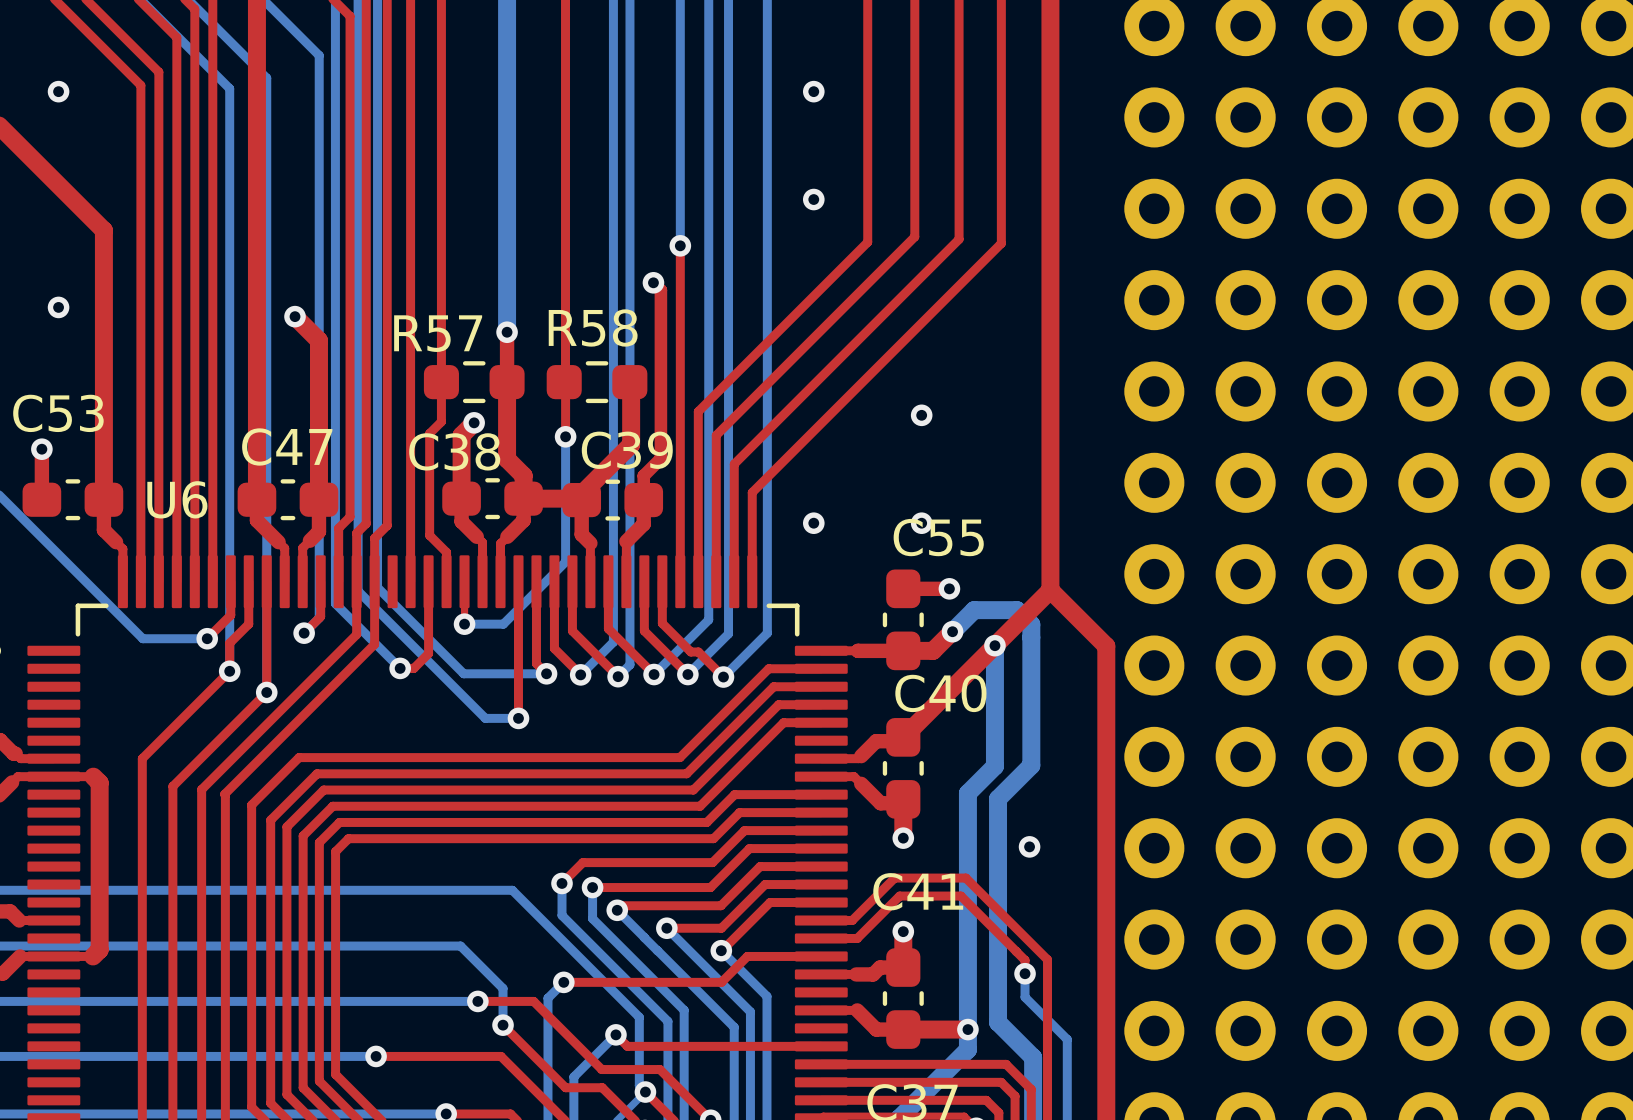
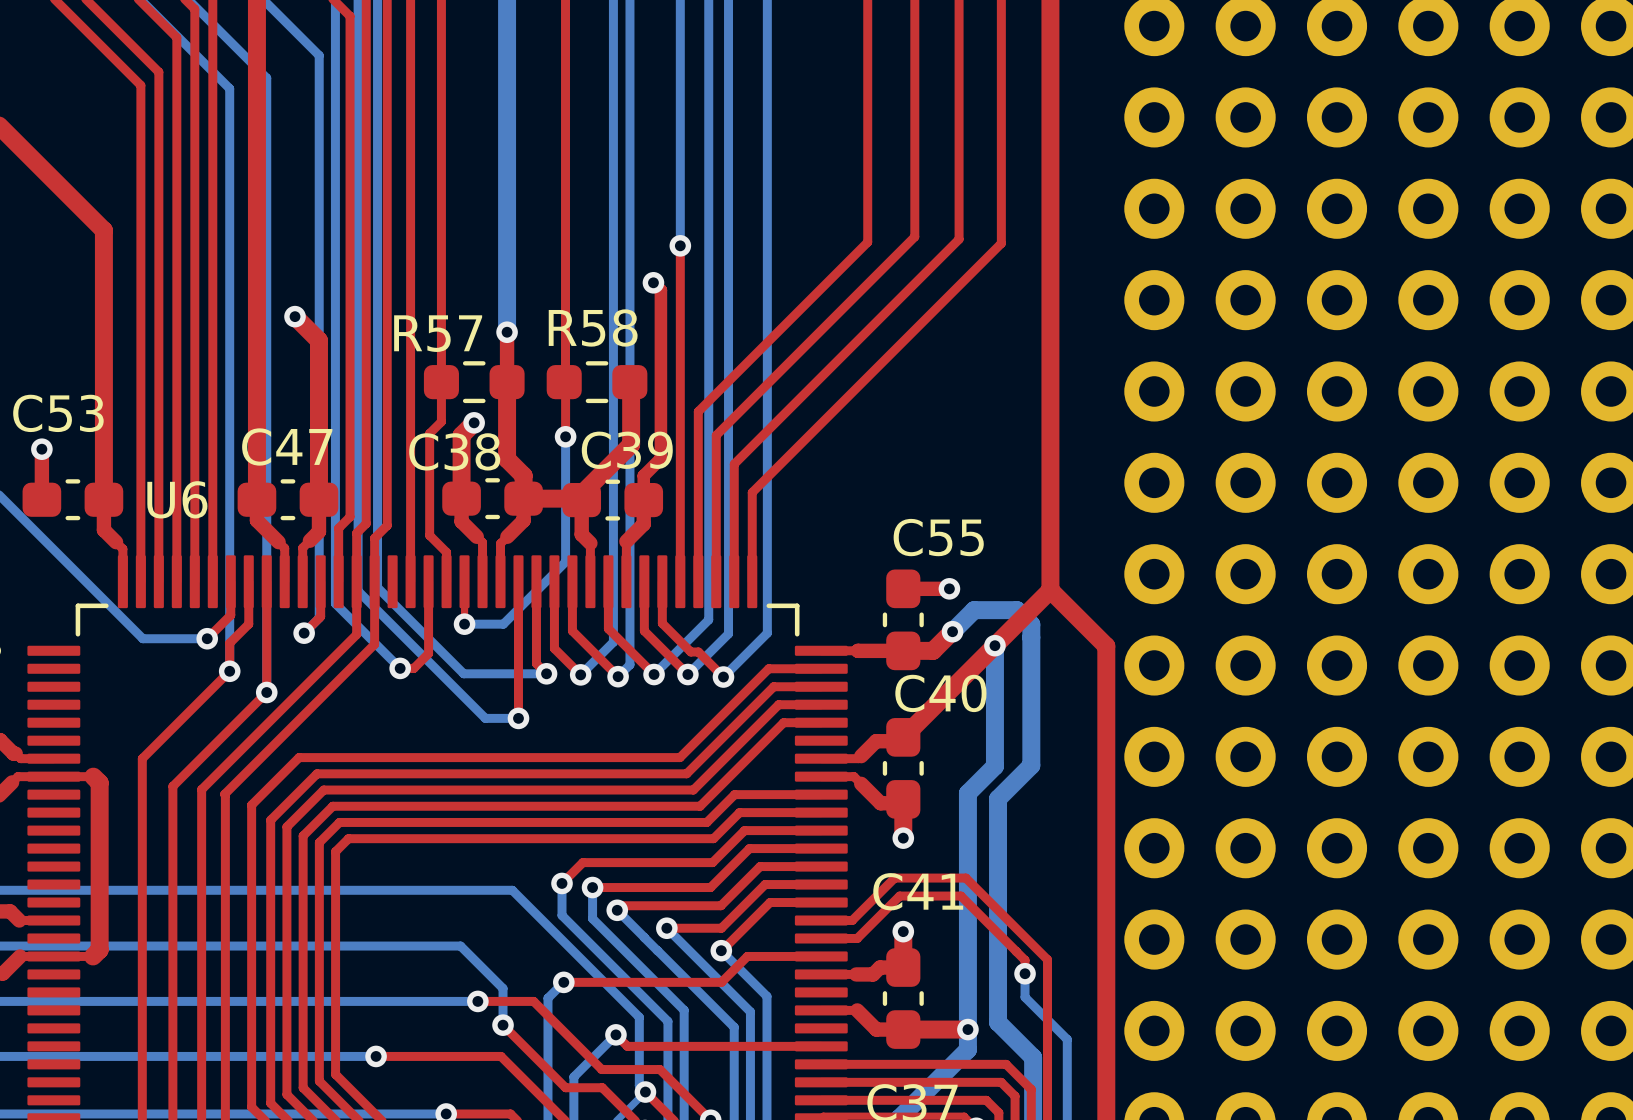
via: (58, 91) -> none
via: (813, 91) -> none
via: (813, 199) -> none
via: (58, 307) -> none
via: (921, 415) -> none
via: (813, 523) -> none
via: (921, 523) -> none
via: (1029, 846) -> none

